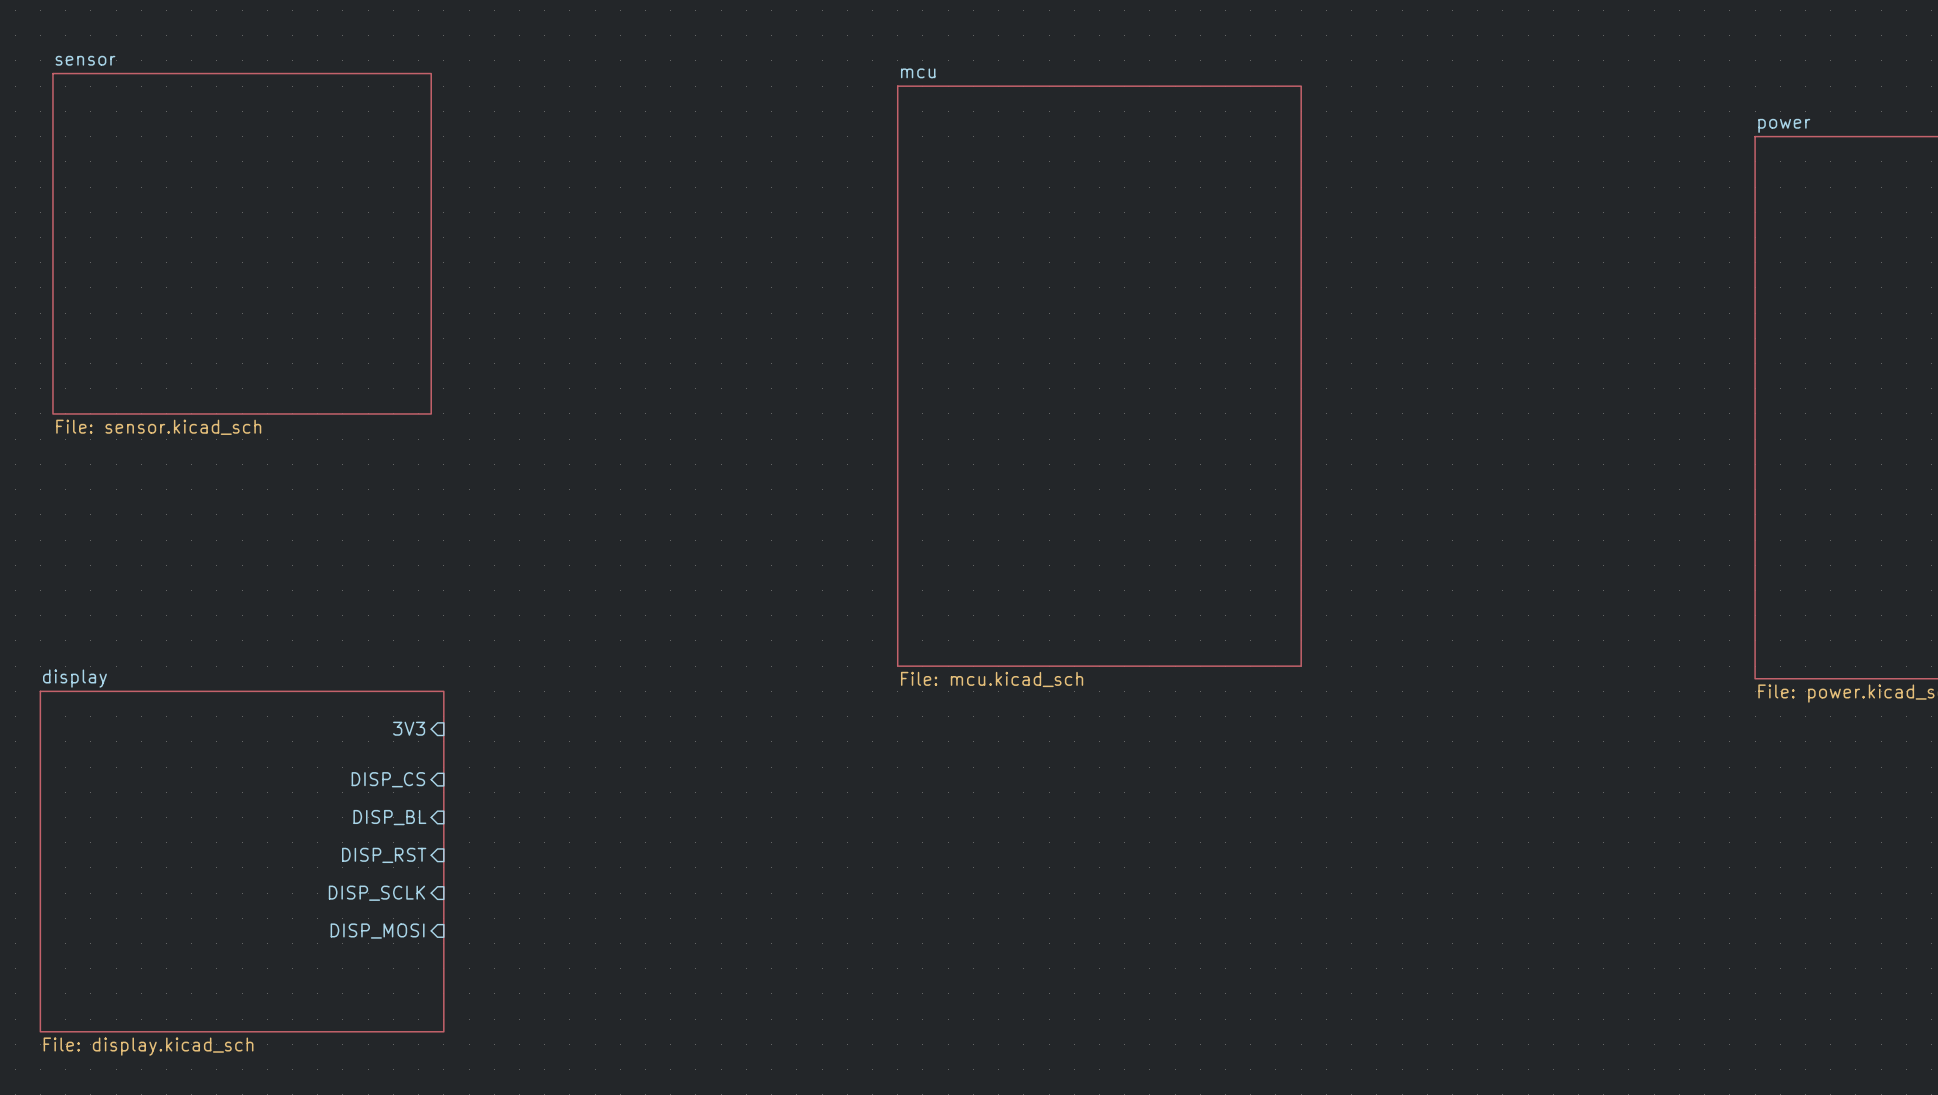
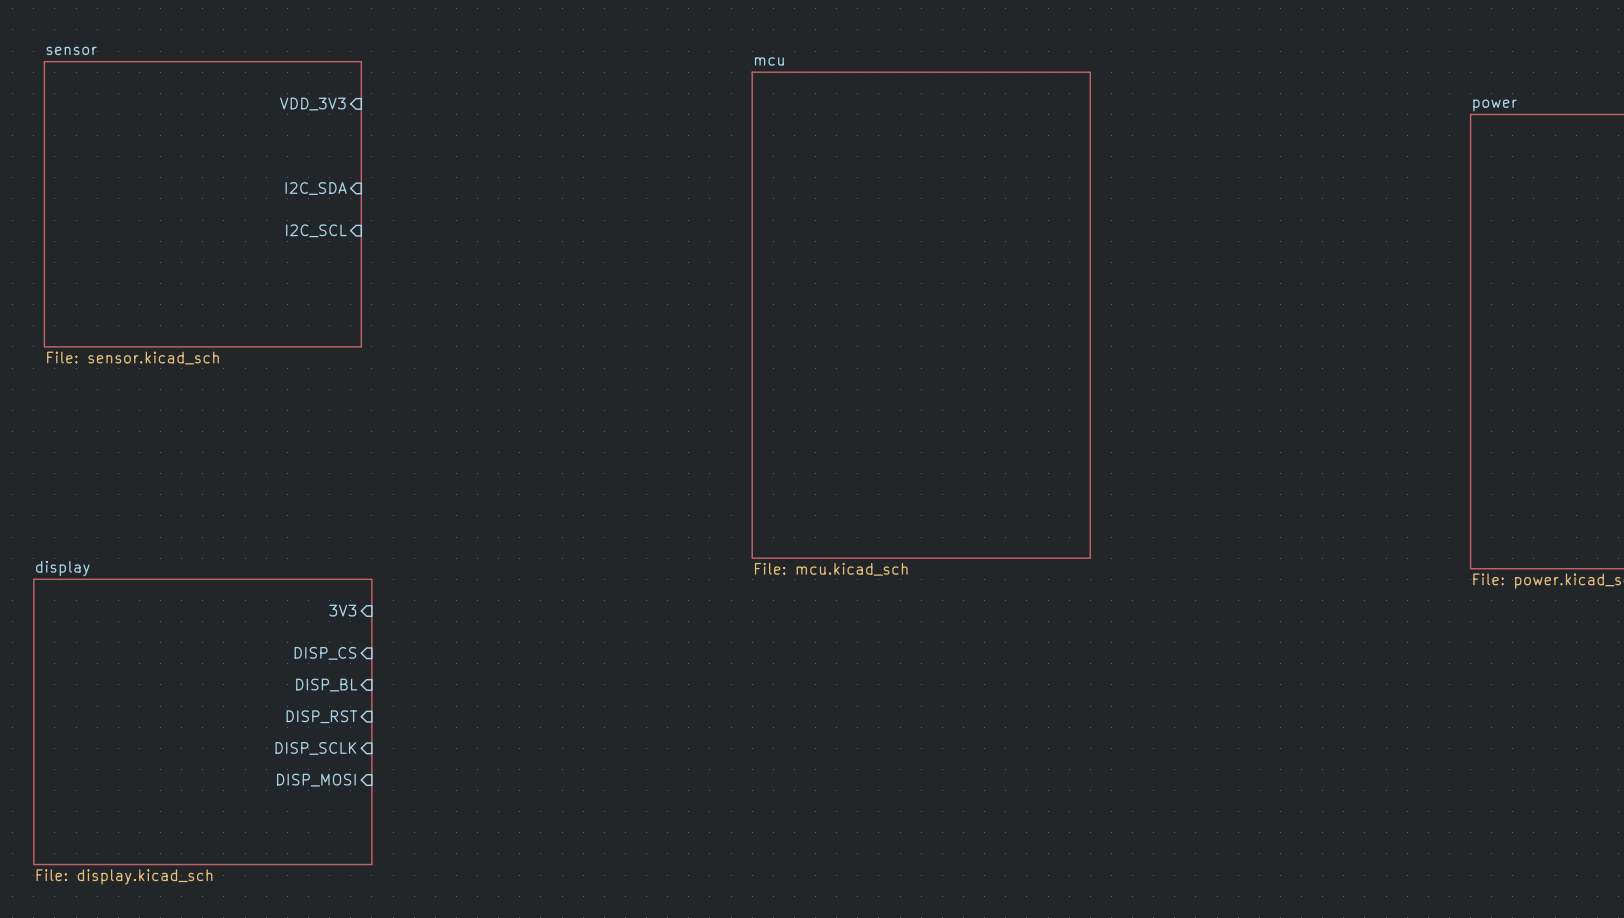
sheet pin: none -> VDD_3V3 (312, 104)
sheet pin: none -> I2C_SDA (316, 188)
sheet pin: none -> I2C_SCL (316, 230)

